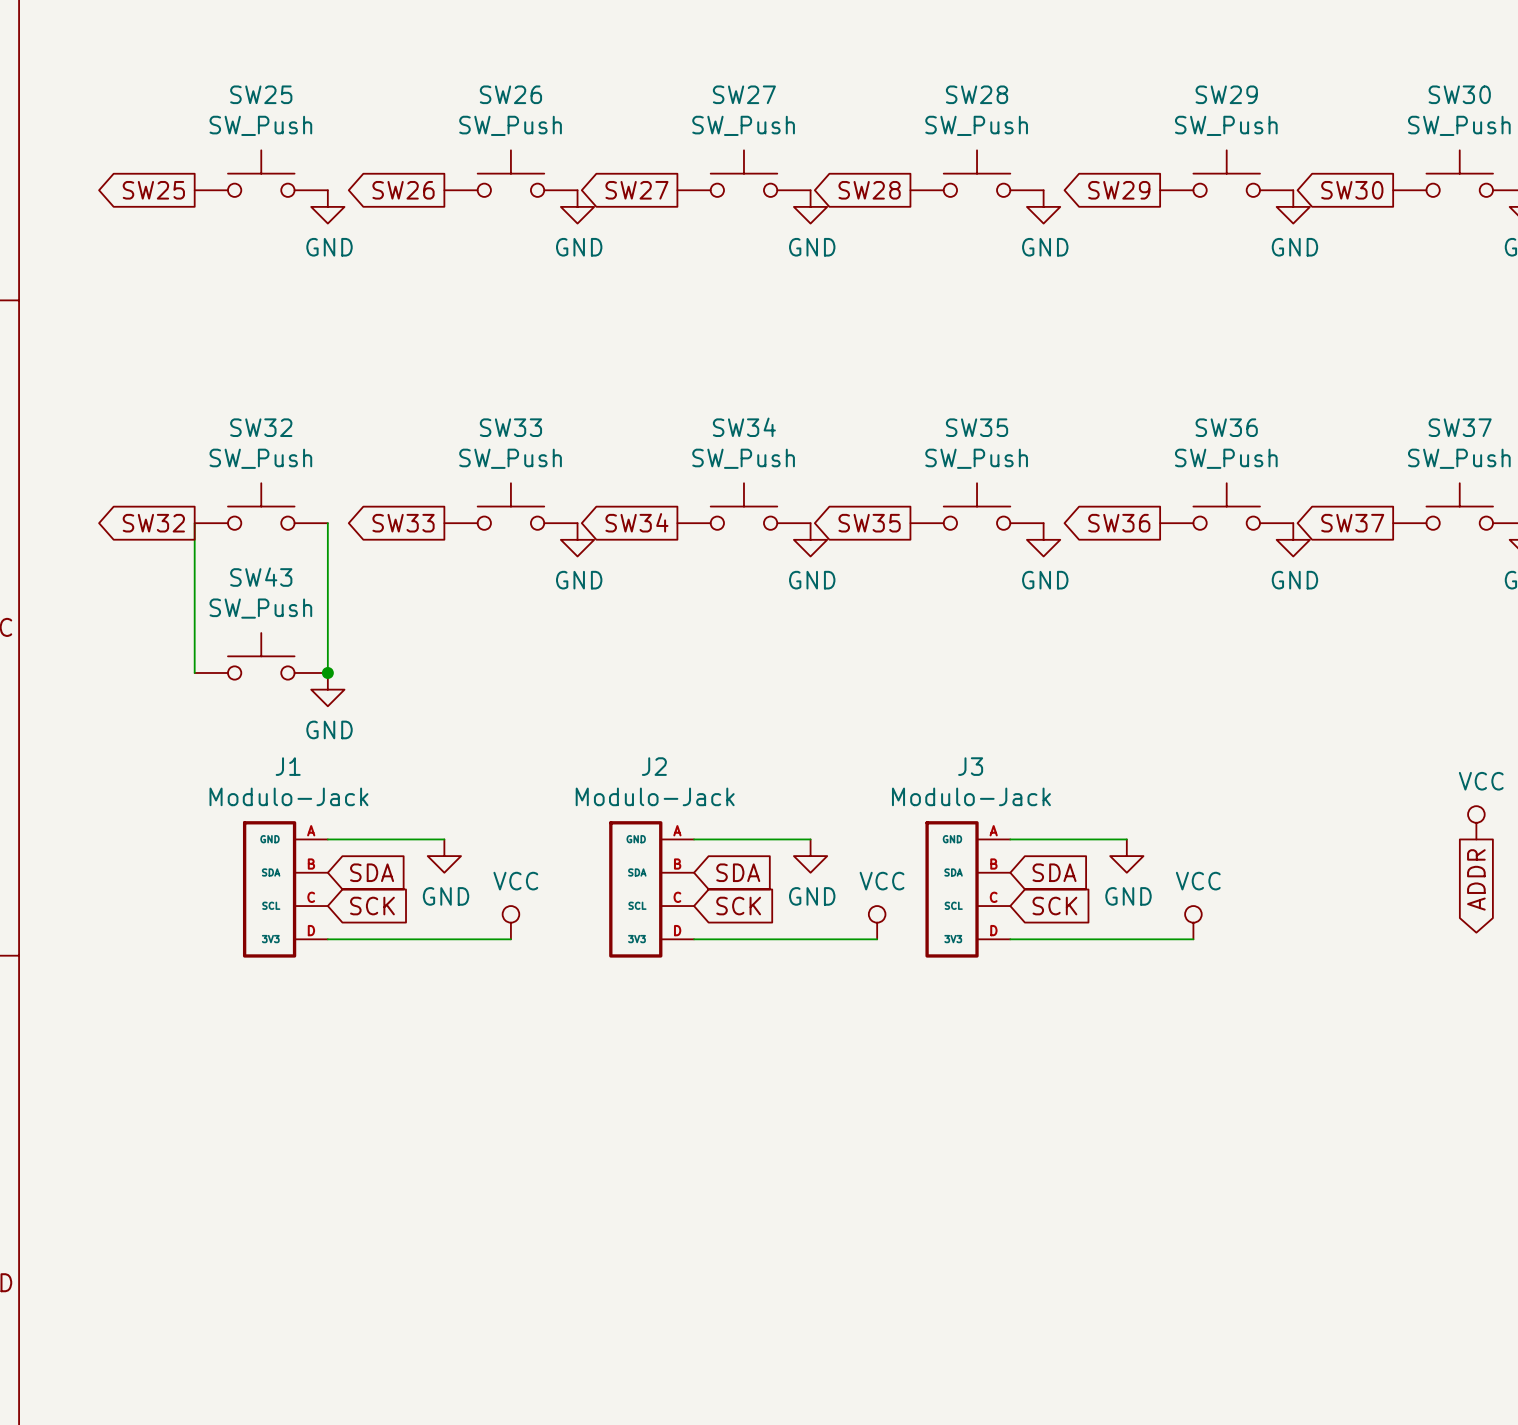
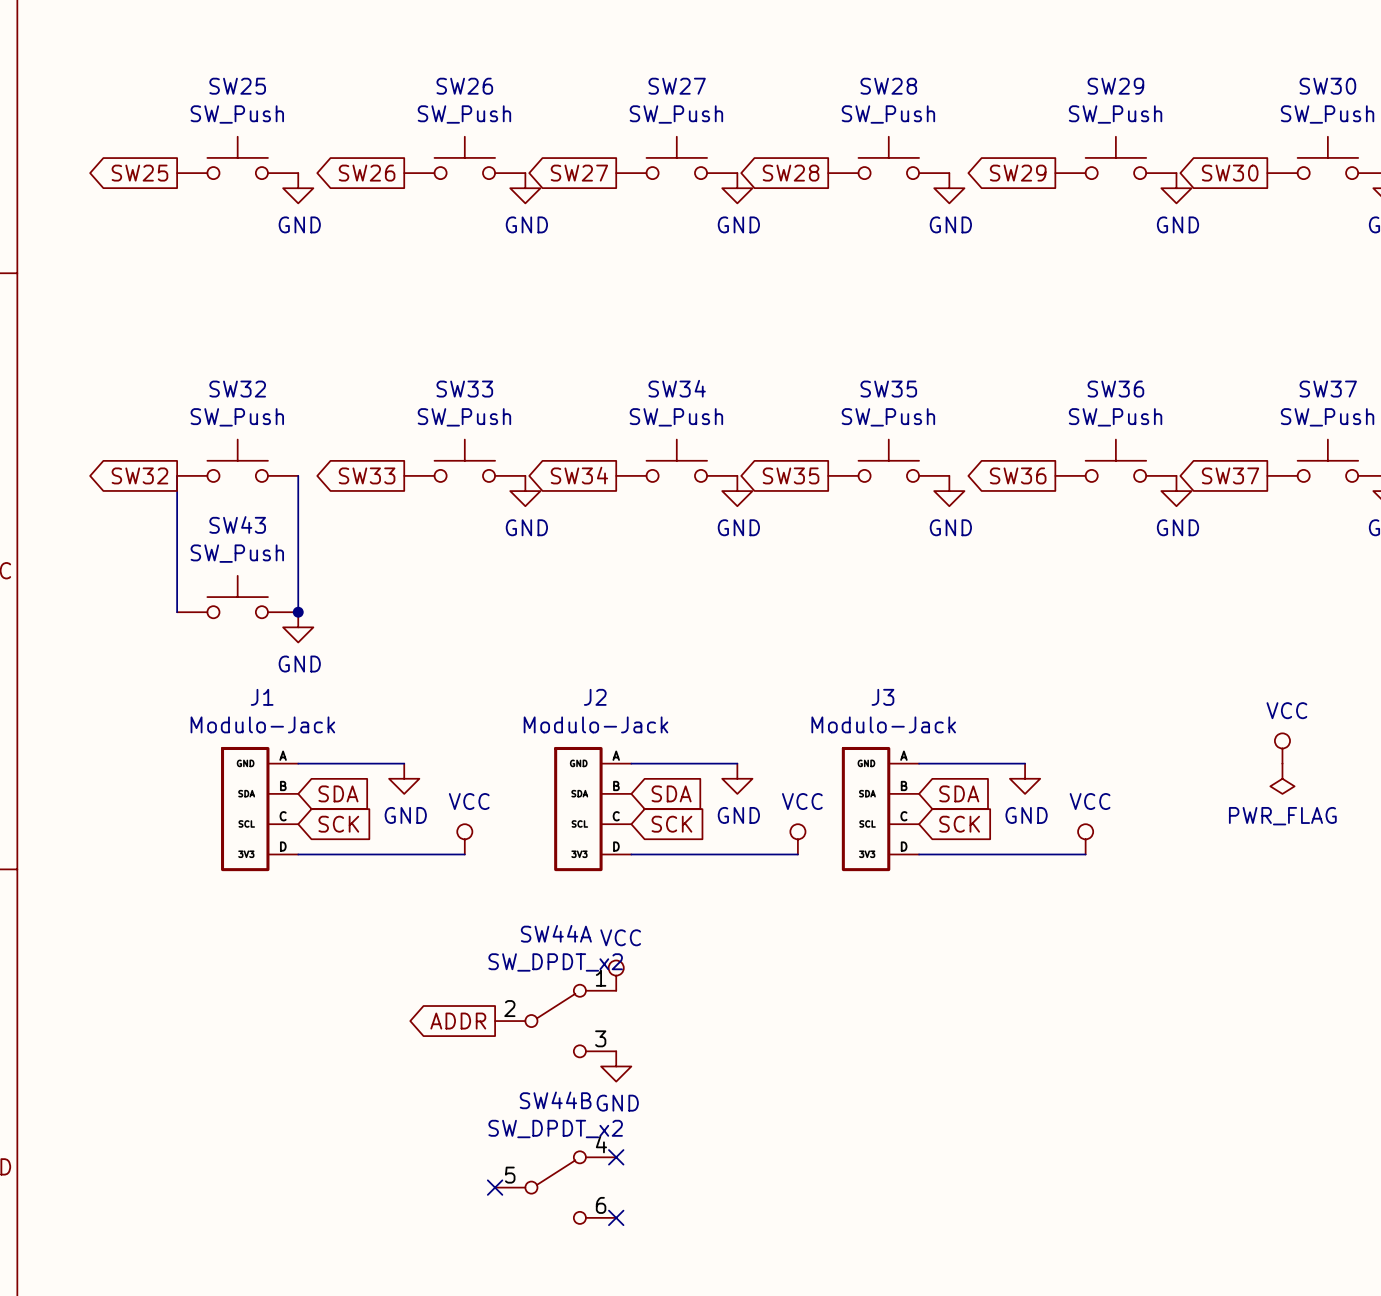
power symbol position: VCC (1476, 822) -> VCC (1282, 748)
power symbol: none -> PWR_FLAG (1282, 778)
global label: ADDR (1476, 879) -> none
power symbol: none -> VCC (616, 975)
global label: none -> ADDR (458, 1021)
SW44A: none -> SW_DPDT_x2 (555, 1021)
power symbol: none -> GND (616, 1066)
no-connect mark: none -> (616, 1157)
no-connect mark: none -> (495, 1187)
SW44B: none -> SW_DPDT_x2 (555, 1187)
no-connect mark: none -> (616, 1217)

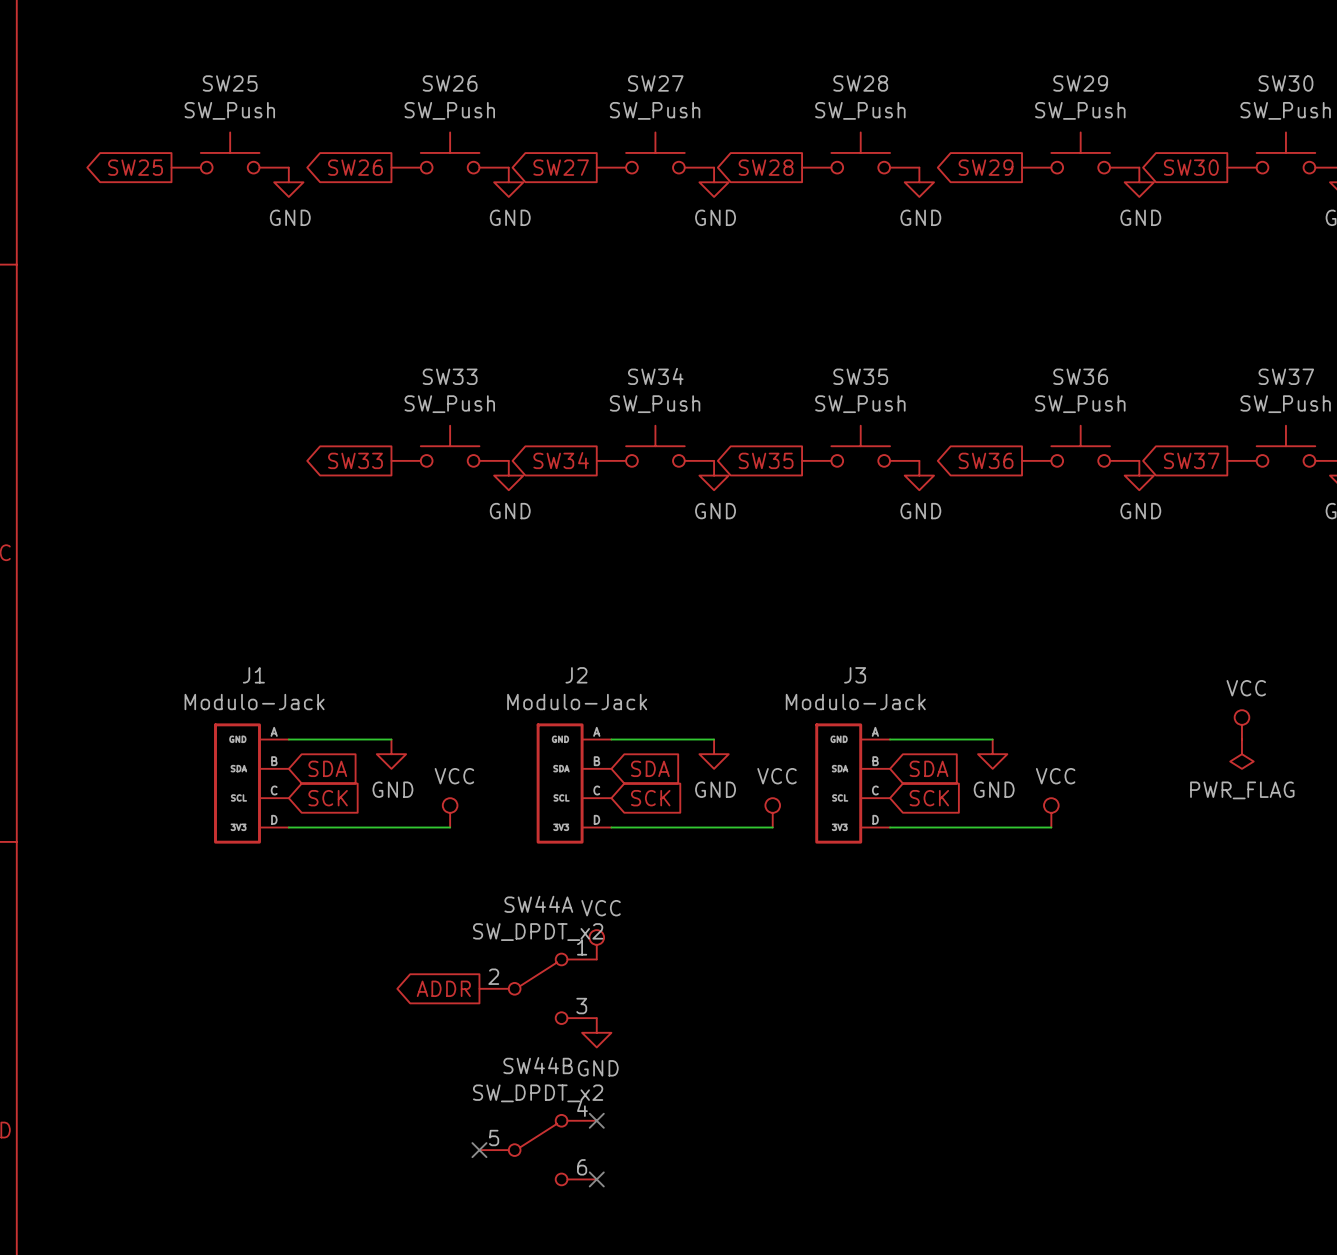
SW32: SW_Push (237, 460) -> none
global label: SW32 (139, 475) -> none
wire: (177, 475) (177, 612) -> none
wire: (298, 475) (298, 612) -> none
SW43: SW_Push (237, 597) -> none
junction: (298, 612) -> none
power symbol: GND (298, 627) -> none

